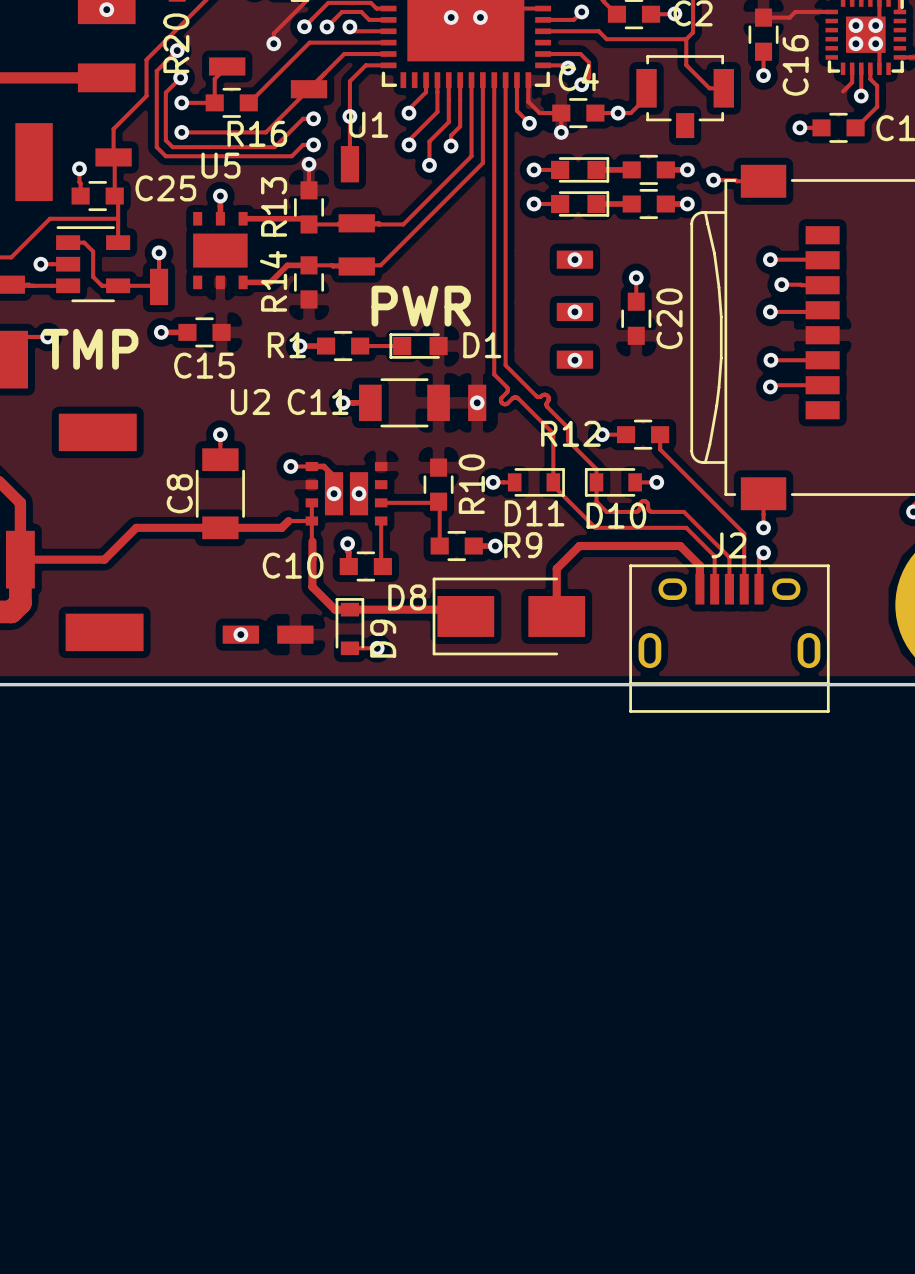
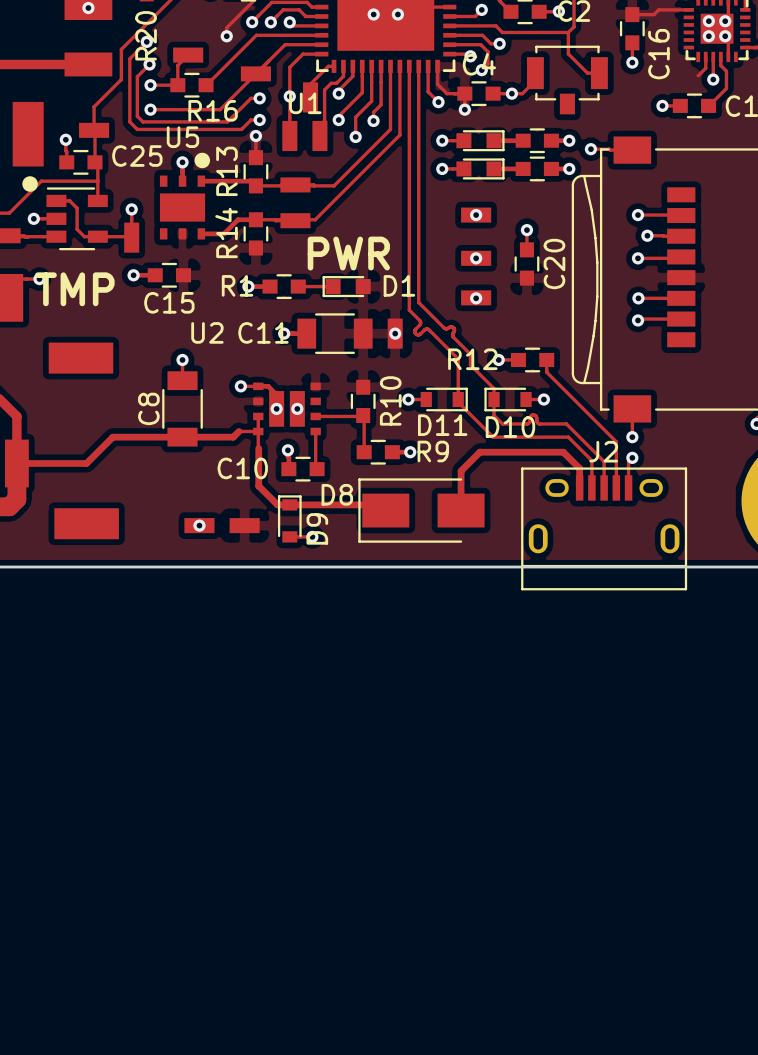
track: none -> (449, 35) (482, 35) (491, 43) (499, 43)
via: none -> (499, 43)
track: none -> (334, 66) (328, 66) (310, 84) (310, 97)
track: none -> (343, 66) (343, 76) (336, 83) (331, 83) (324, 89) (324, 131) (319, 136) (319, 125) (324, 120)
part: none -> (310, 97)
part: none -> (319, 136)
drawing: none -> [194, 152, 211, 169]
drawing: none -> [22, 176, 38, 192]

